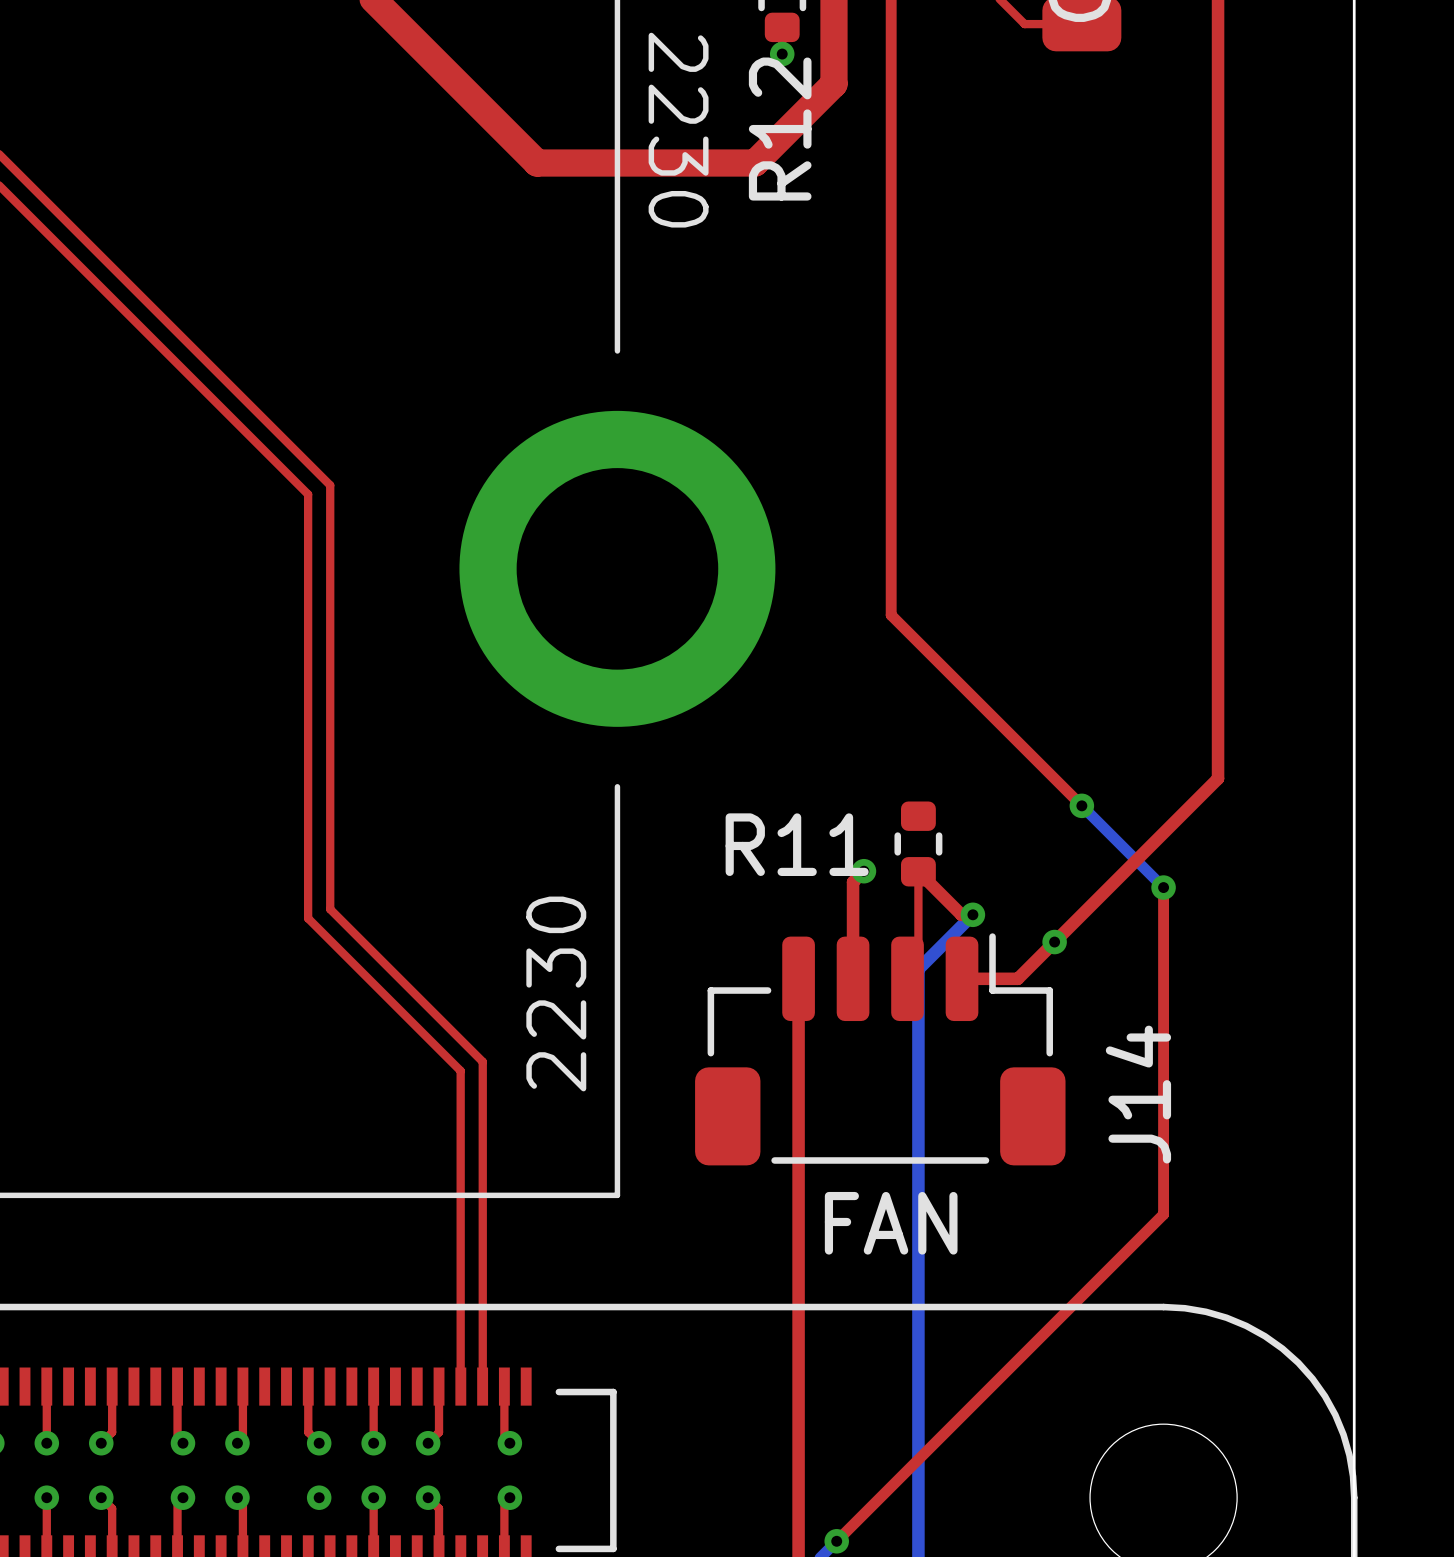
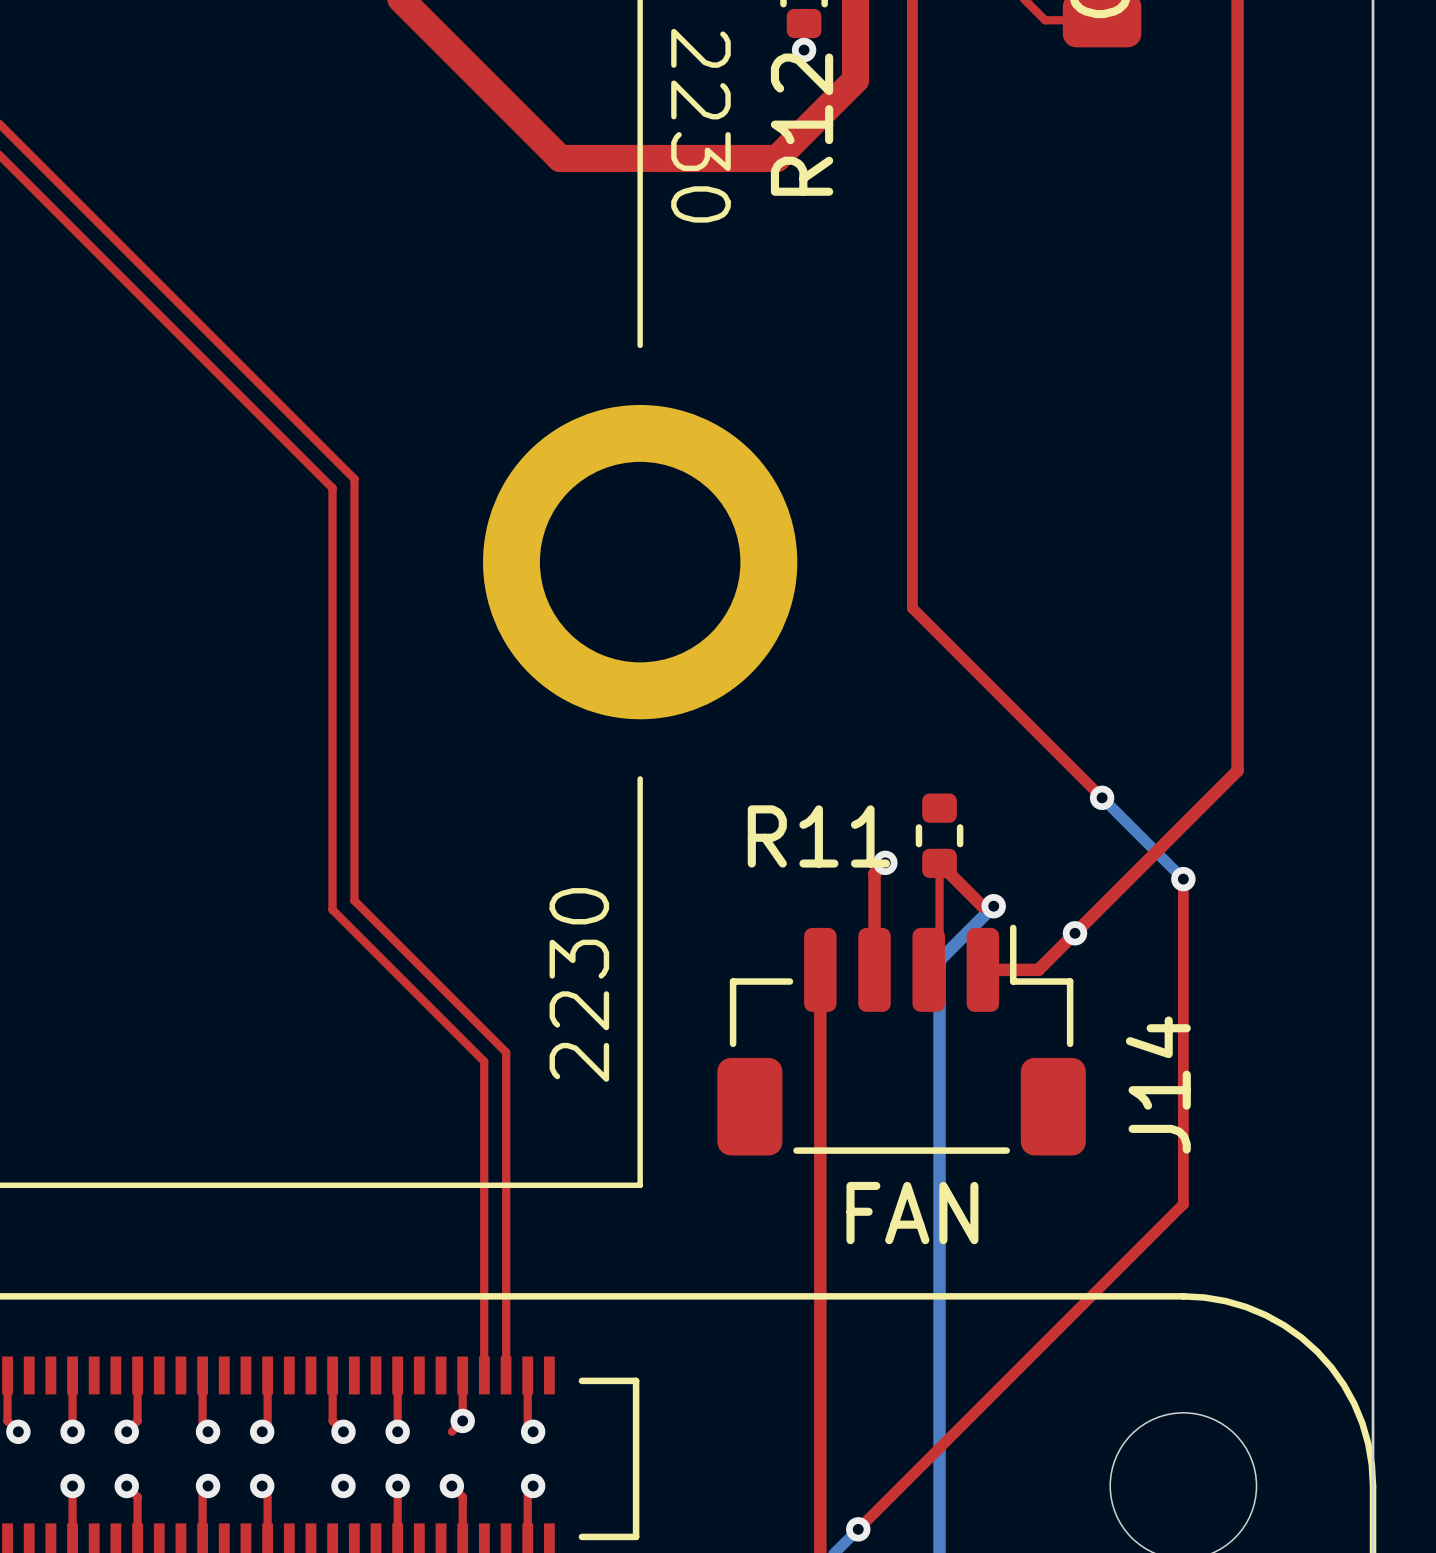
via position: (428, 1443) -> (462, 1420)

